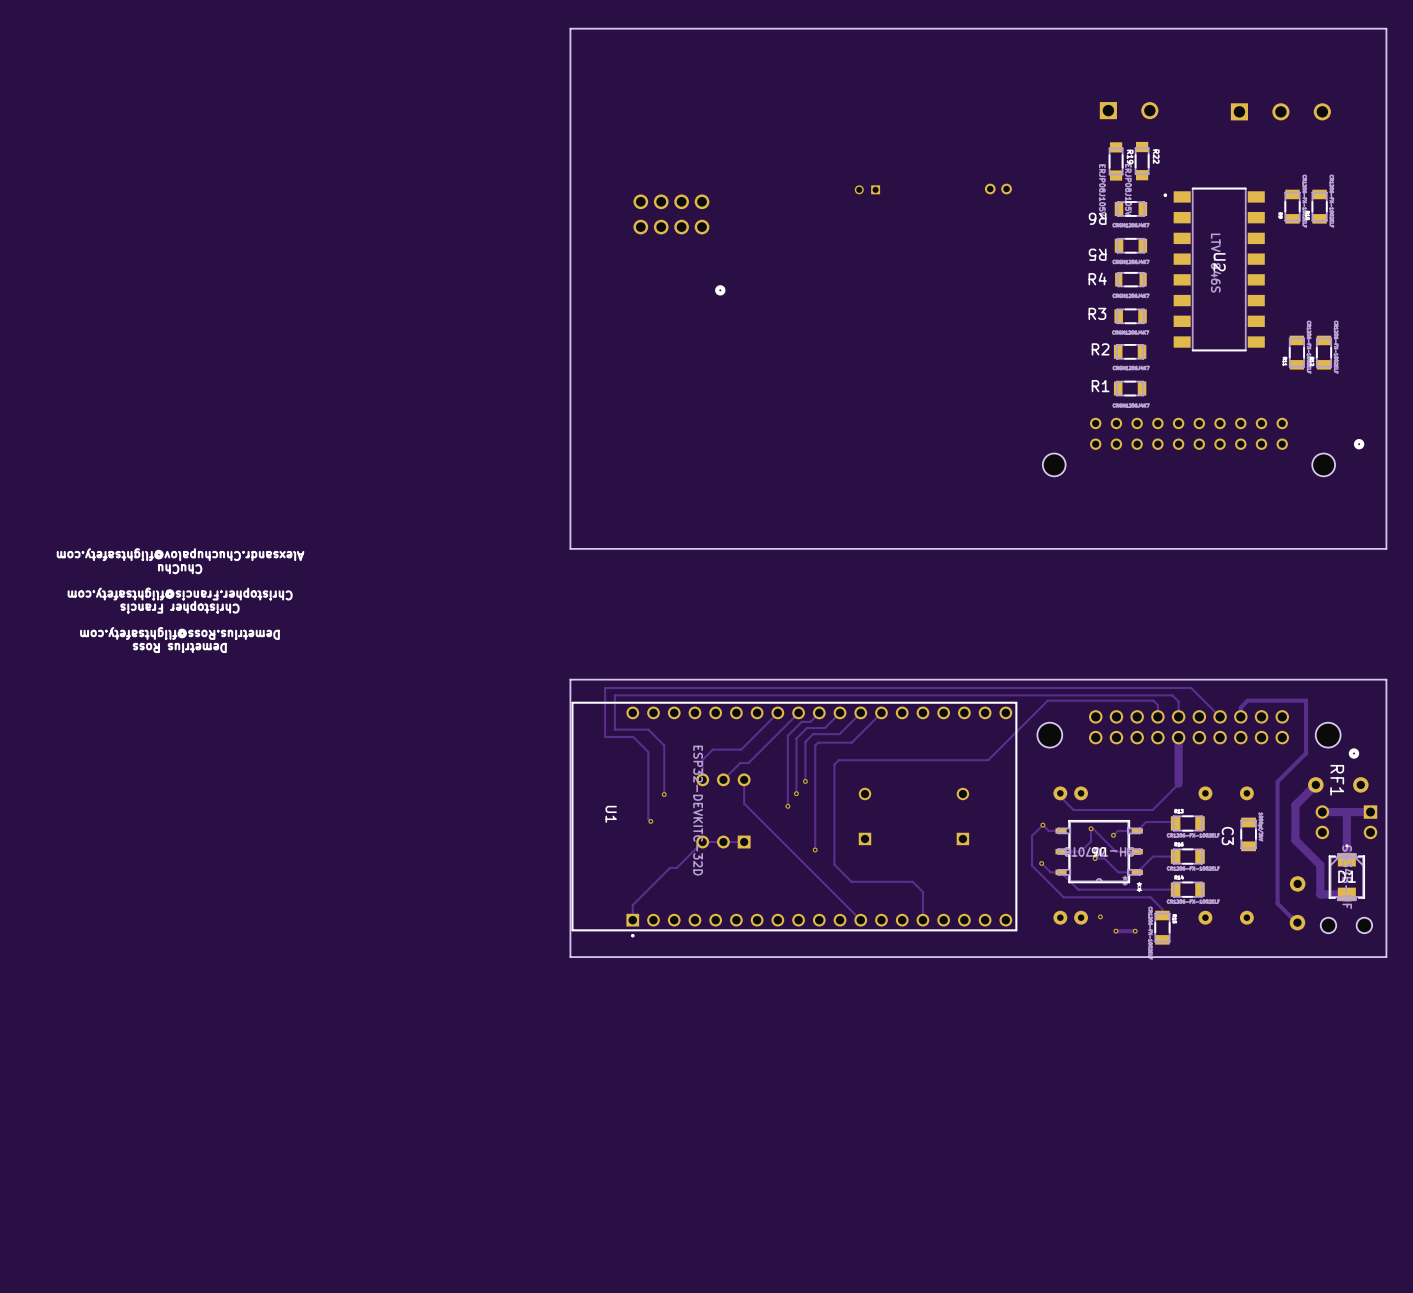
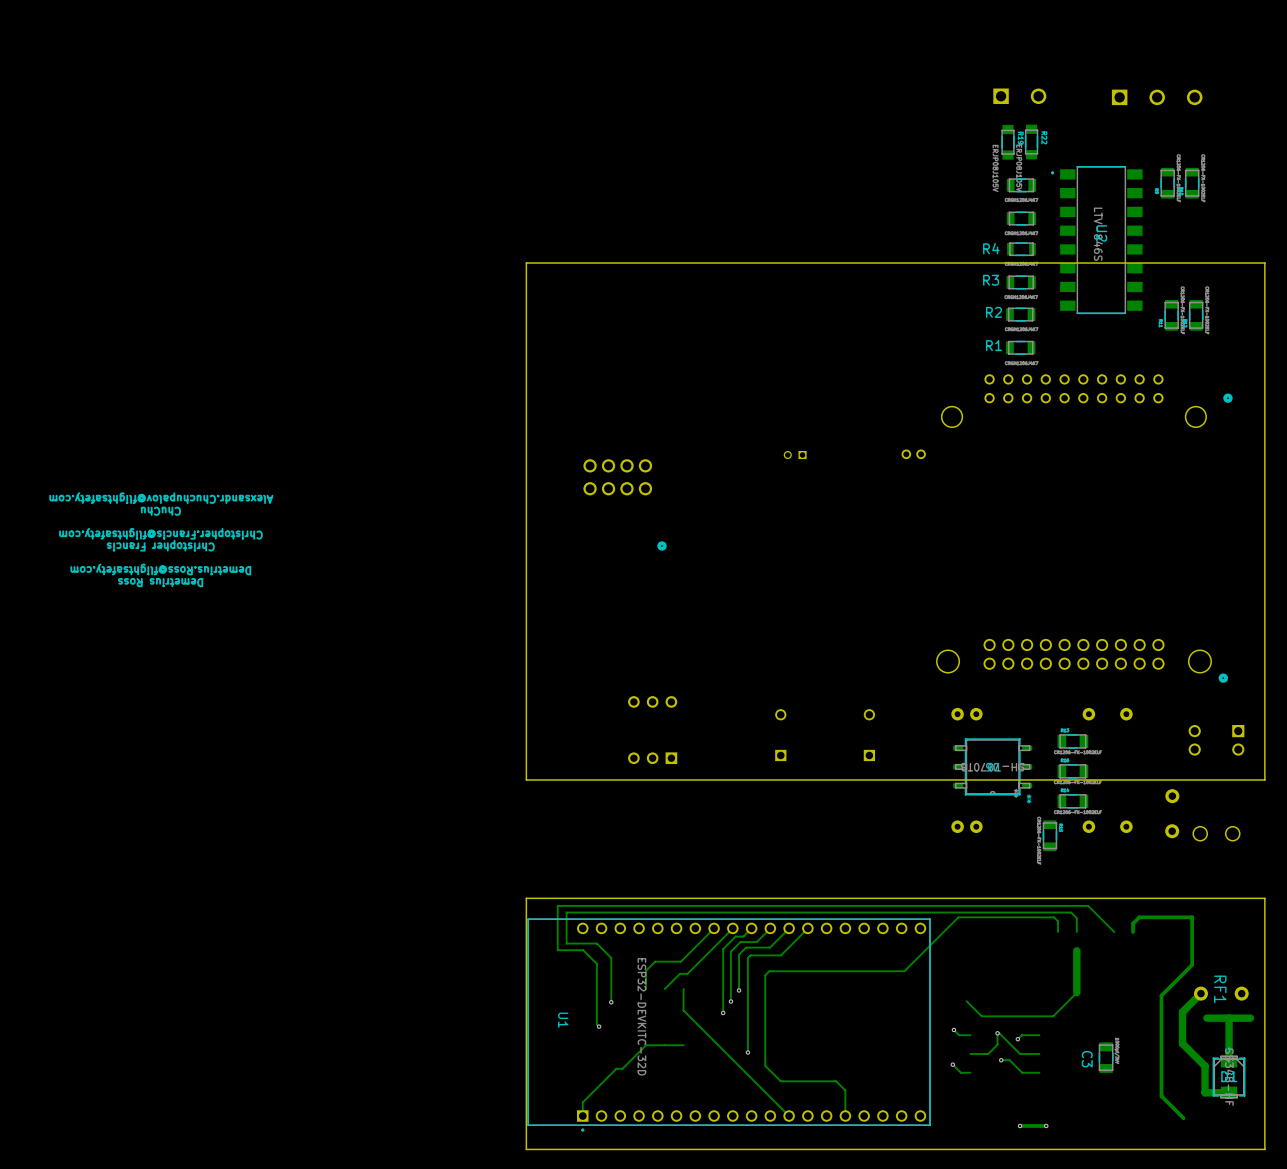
board edge: (1386, 28) (1386, 548) (570, 548) (570, 28) (1386, 28) -> none
part: (867, 189) -> none
part: (998, 189) -> none
part: (671, 214) -> none
text: R6 (1097, 218) -> none
text: R5 (1097, 254) -> none
part: (720, 290) -> none
board edge: none -> (1264, 263) (1264, 779) (526, 779) (526, 263) (1264, 263)
part: none -> (913, 454)
part: none -> (795, 455)
part: none -> (617, 477)
part: none -> (661, 546)
board edge: (1386, 679) (570, 679) (570, 957) (1386, 957) (1386, 679) -> none
track: (781, 709) (741, 749) (712, 749) (702, 759) (702, 779) -> none
track: (801, 709) (748, 763) (740, 763) (723, 779) -> none
track: (822, 709) (810, 721) (801, 721) (787, 735) (787, 806) -> none
track: (843, 709) (825, 727) (807, 727) (796, 738) (796, 793) -> none
track: (864, 709) (839, 734) (813, 734) (805, 741) (805, 781) -> none
track: (884, 709) (851, 742) (818, 742) (815, 745) (815, 849) -> none
track: (1157, 716) (1157, 705) (1153, 700) (1047, 700) (988, 760) (838, 760) (834, 764) (834, 864) (851, 881) (912, 881) (922, 892) (922, 920) -> none
track: (1178, 716) (1178, 701) (1172, 695) (614, 695) (614, 729) (648, 729) (664, 745) (664, 794) -> none
track: (1220, 716) (1191, 688) (605, 688) (605, 736) (633, 736) (648, 752) (648, 818) (650, 821) -> none
track: (1240, 716) (1240, 707) (1247, 700) (1306, 700) (1306, 753) (1277, 781) (1277, 903) (1296, 922) -> none
track: (1178, 737) (1178, 783) (1152, 810) (1073, 810) (1056, 793) -> none
track: (744, 779) (744, 803) (860, 920) -> none
via: (805, 781) -> none
track: (1315, 784) (1295, 805) (1295, 840) (1320, 865) (1320, 894) (1346, 894) -> none
RF1 position: (1338, 784) -> (1221, 993)
via: (796, 793) -> none
via: (664, 794) -> none
via: (787, 806) -> none
track: (1322, 812) (1346, 812) -> none
track: (1346, 812) (1346, 859) -> none
track: (1370, 812) (1346, 812) -> none
U1 position: (794, 819) -> (729, 1025)
via: (650, 821) -> none
via: (1042, 825) -> none
track: (1175, 825) (1172, 822) (1146, 822) (1137, 830) (1117, 830) (1113, 835) -> none
via: (1091, 828) -> none
track: (1061, 830) (1048, 830) (1042, 825) (1032, 835) (1032, 865) (1063, 897) (1150, 897) (1162, 909) (1162, 915) -> none
C3 position: (1248, 834) -> (1106, 1057)
via: (1113, 835) -> none
track: (744, 842) (702, 842) (676, 867) (669, 867) (632, 905) (632, 920) -> none
via: (815, 849) -> none
track: (1137, 851) (1115, 851) (1093, 828) (1091, 828) (1091, 841) (1080, 851) (1061, 851) -> none
via: (1095, 858) -> none
track: (1175, 858) (1153, 856) (1137, 872) (1118, 872) (1104, 858) (1095, 858) -> none
track: (1041, 863) (1050, 872) (1061, 872) (1078, 889) (1174, 889) (1175, 891) -> none
via: (1041, 863) -> none
D1 position: (1346, 872) -> (1229, 1073)
via: (1100, 916) -> none
via: (1115, 931) -> none
track: (1135, 931) (1115, 931) -> none
via: (1135, 931) -> none
board edge: none -> (1264, 898) (526, 898) (526, 1149) (1264, 1149) (1264, 898)
track: none -> (717, 925) (680, 961) (655, 961) (646, 970) (646, 989)
track: none -> (735, 925) (687, 973) (679, 973) (664, 989)
track: none -> (754, 925) (743, 936) (735, 936) (723, 949) (723, 1012)
track: none -> (773, 925) (756, 942) (740, 942) (730, 951) (730, 1001)
track: none -> (792, 925) (770, 947) (746, 947) (739, 954) (739, 990)
track: none -> (810, 925) (781, 955) (750, 955) (747, 957) (747, 1052)
track: none -> (1058, 932) (1058, 921) (1054, 917) (958, 917) (904, 971) (769, 971) (765, 975) (765, 1065) (780, 1081) (836, 1081) (845, 1090) (845, 1116)
track: none -> (1076, 932) (1076, 918) (1071, 912) (566, 912) (566, 943) (596, 943) (611, 957) (611, 1002)
track: none -> (1114, 932) (1088, 905) (557, 905) (557, 950) (583, 950) (596, 963) (596, 1024) (599, 1026)
track: none -> (1133, 932) (1133, 923) (1139, 917) (1192, 917) (1192, 964) (1161, 995) (1161, 1096) (1183, 1118)
track: none -> (1076, 950) (1076, 992) (1053, 1016) (981, 1016) (966, 1001)
track: none -> (683, 989) (683, 1010) (789, 1116)
via: none -> (739, 990)
track: none -> (1200, 993) (1182, 1012) (1182, 1043) (1205, 1066) (1205, 1092) (1228, 1092)
via: none -> (730, 1001)
via: none -> (611, 1002)
via: none -> (723, 1012)
track: none -> (1206, 1018) (1229, 1018)
track: none -> (1229, 1018) (1229, 1061)
track: none -> (1250, 1018) (1229, 1018)
via: none -> (599, 1026)
track: none -> (953, 1029) (959, 1035) (970, 1035)
via: none -> (953, 1029)
via: none -> (997, 1033)
track: none -> (1039, 1035) (1021, 1035) (1017, 1039)
via: none -> (1017, 1039)
track: none -> (683, 1045) (646, 1045) (622, 1068) (616, 1068) (582, 1102) (582, 1116)
via: none -> (747, 1052)
track: none -> (1039, 1053) (1020, 1053) (999, 1033) (997, 1033) (997, 1044) (988, 1053) (970, 1053)
track: none -> (1001, 1060) (1009, 1060) (1022, 1072) (1039, 1072)
via: none -> (1001, 1060)
track: none -> (952, 1064) (960, 1072) (970, 1072)
via: none -> (952, 1064)
via: none -> (1020, 1125)
track: none -> (1046, 1125) (1020, 1125)
via: none -> (1046, 1125)

